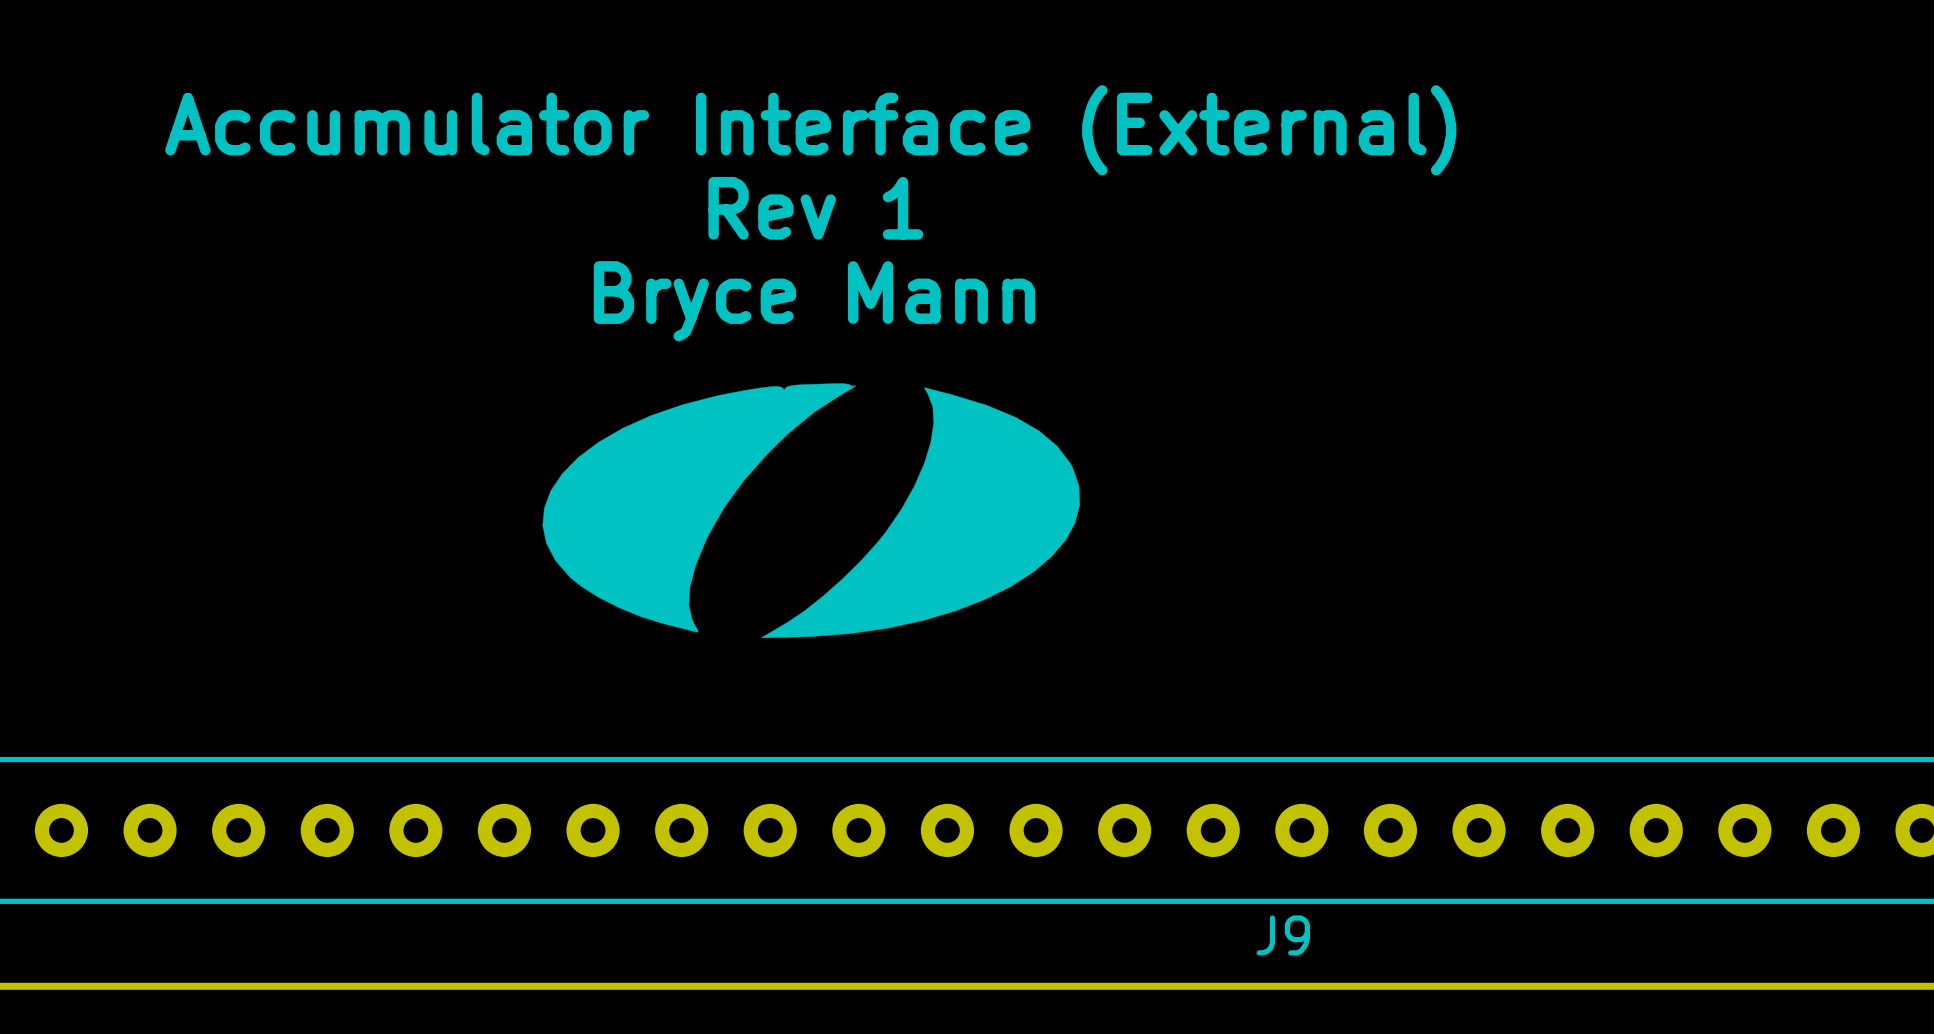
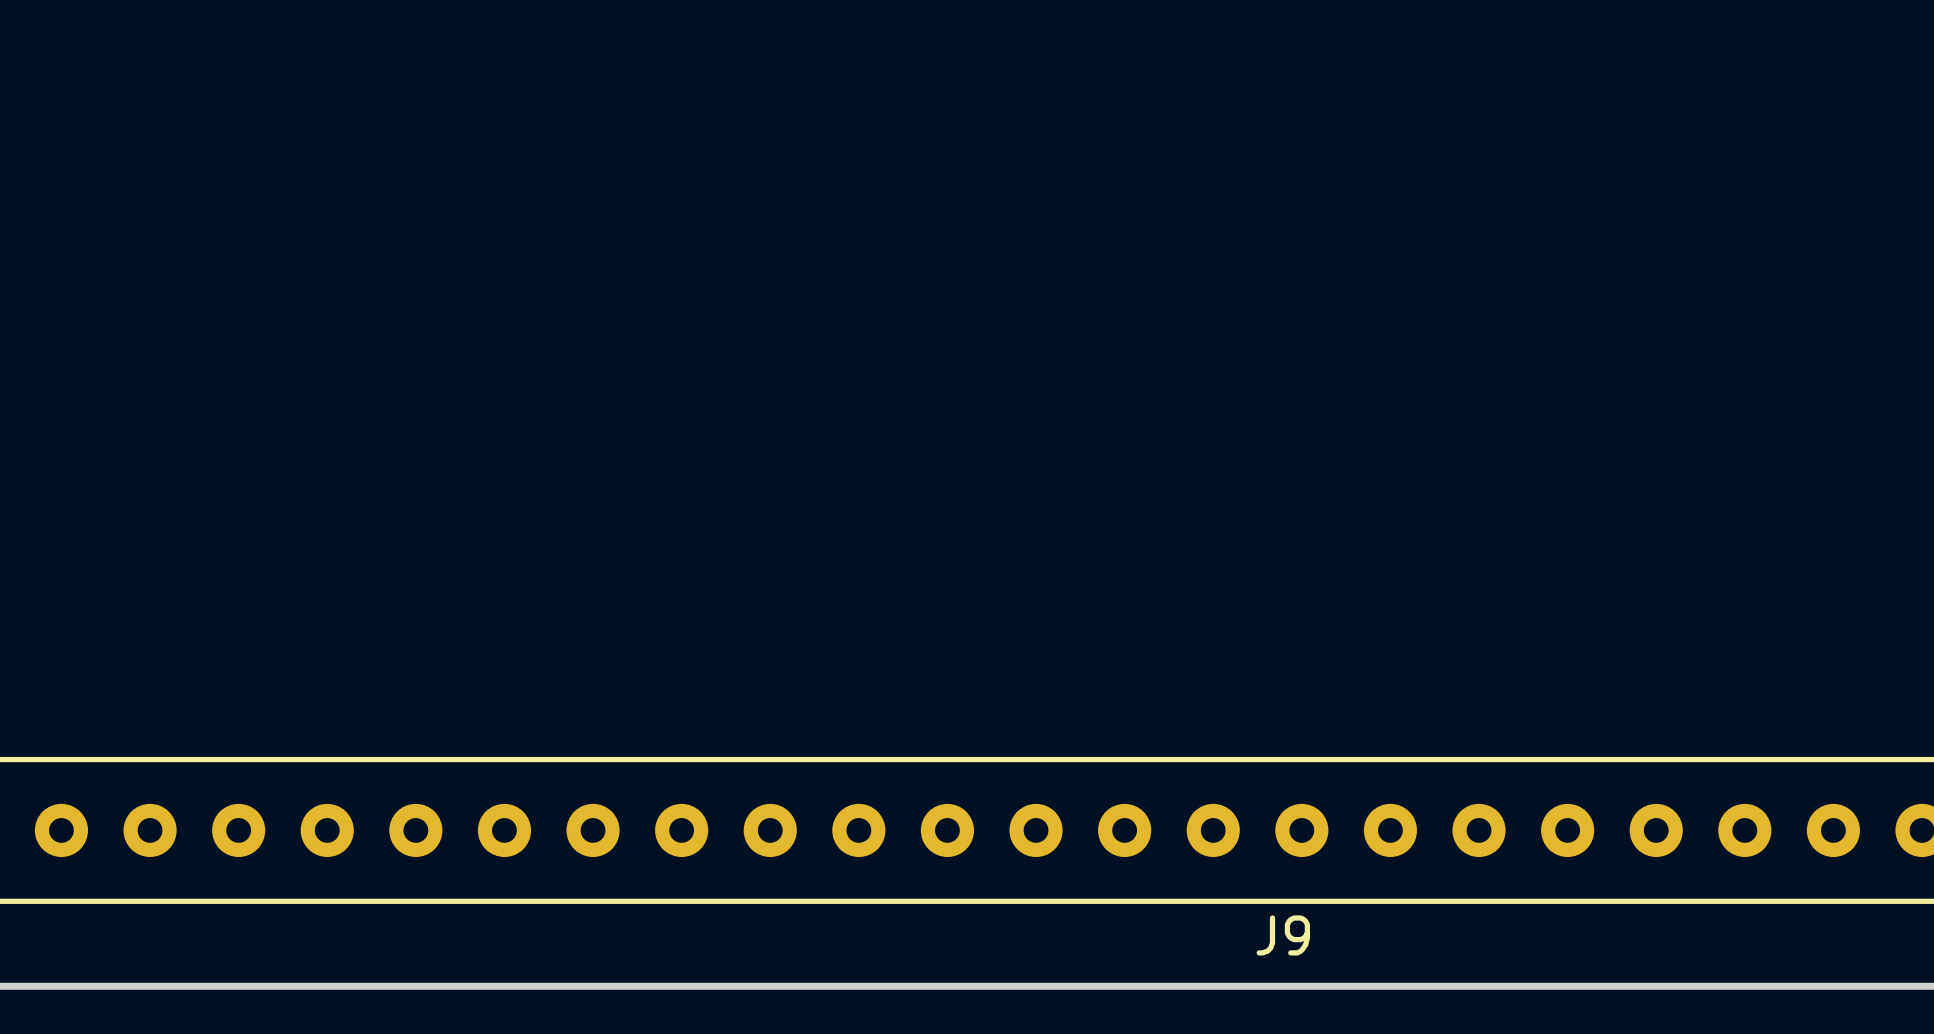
text: Accumulator Interface (External) (810, 130) -> none
text: Rev 1 (815, 208) -> none
text: Bryce Mann (814, 301) -> none
drawing: [542, 383, 1080, 639] -> none

